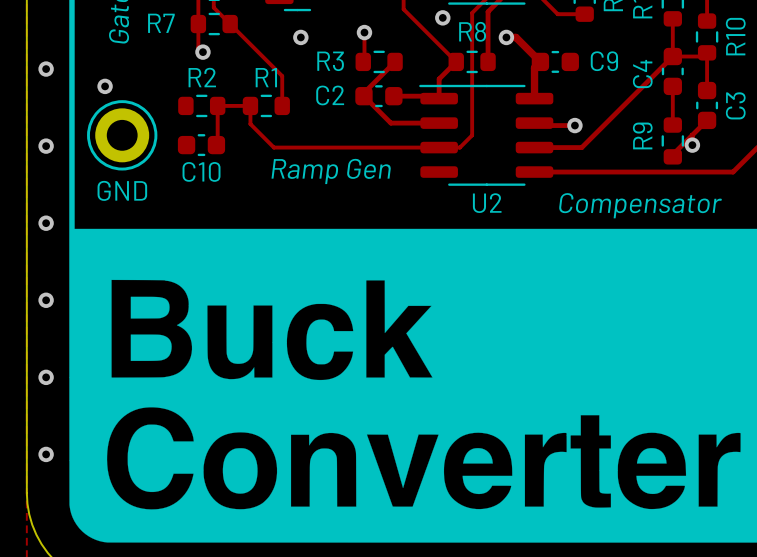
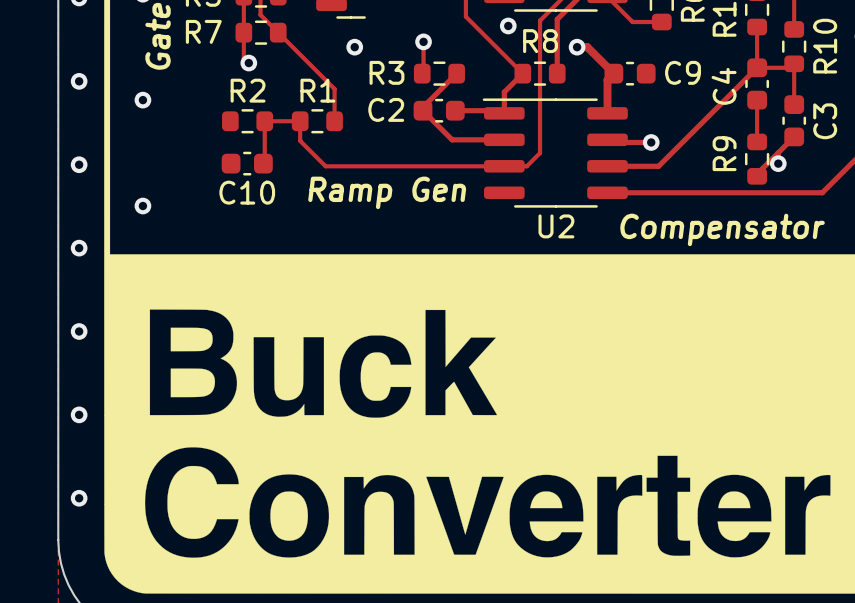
part: (122, 135) -> none
via: none -> (142, 206)
text: GND (122, 190) -> none

